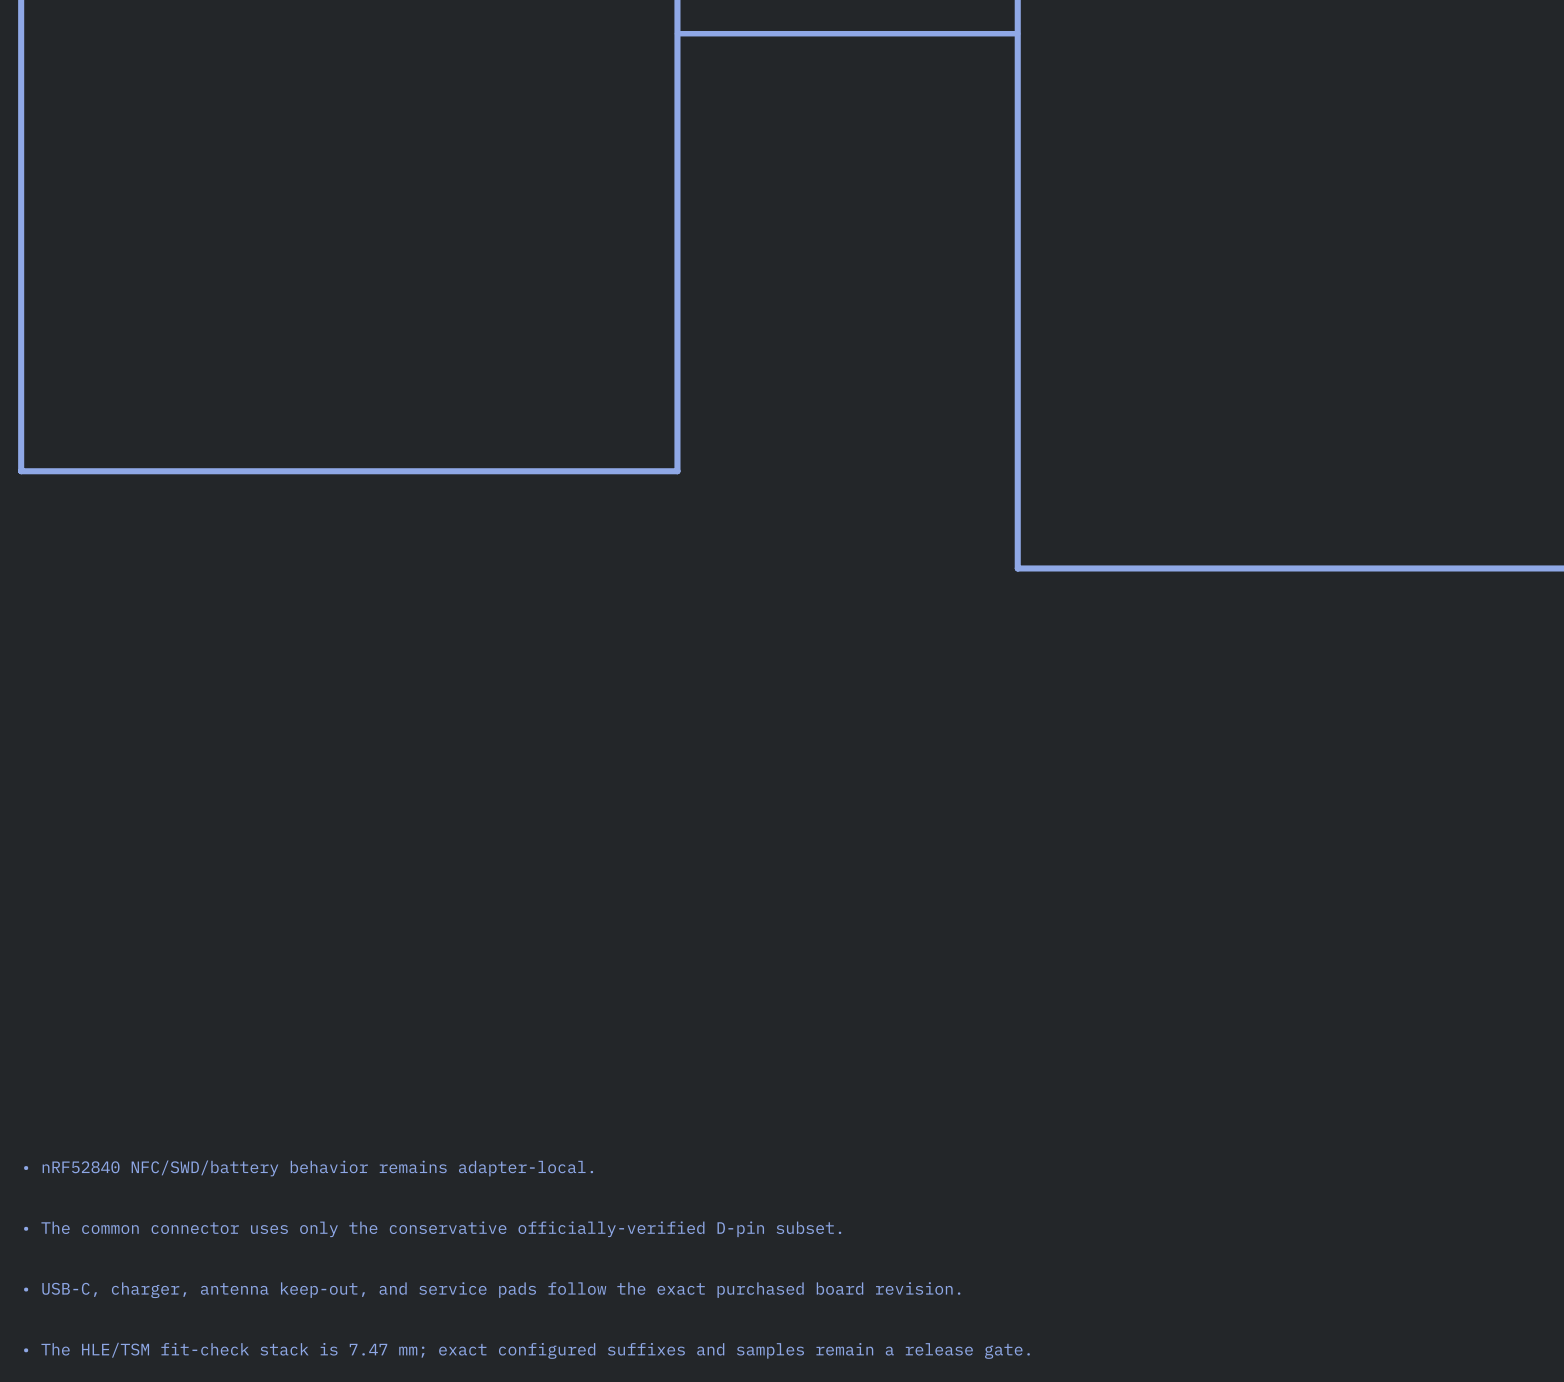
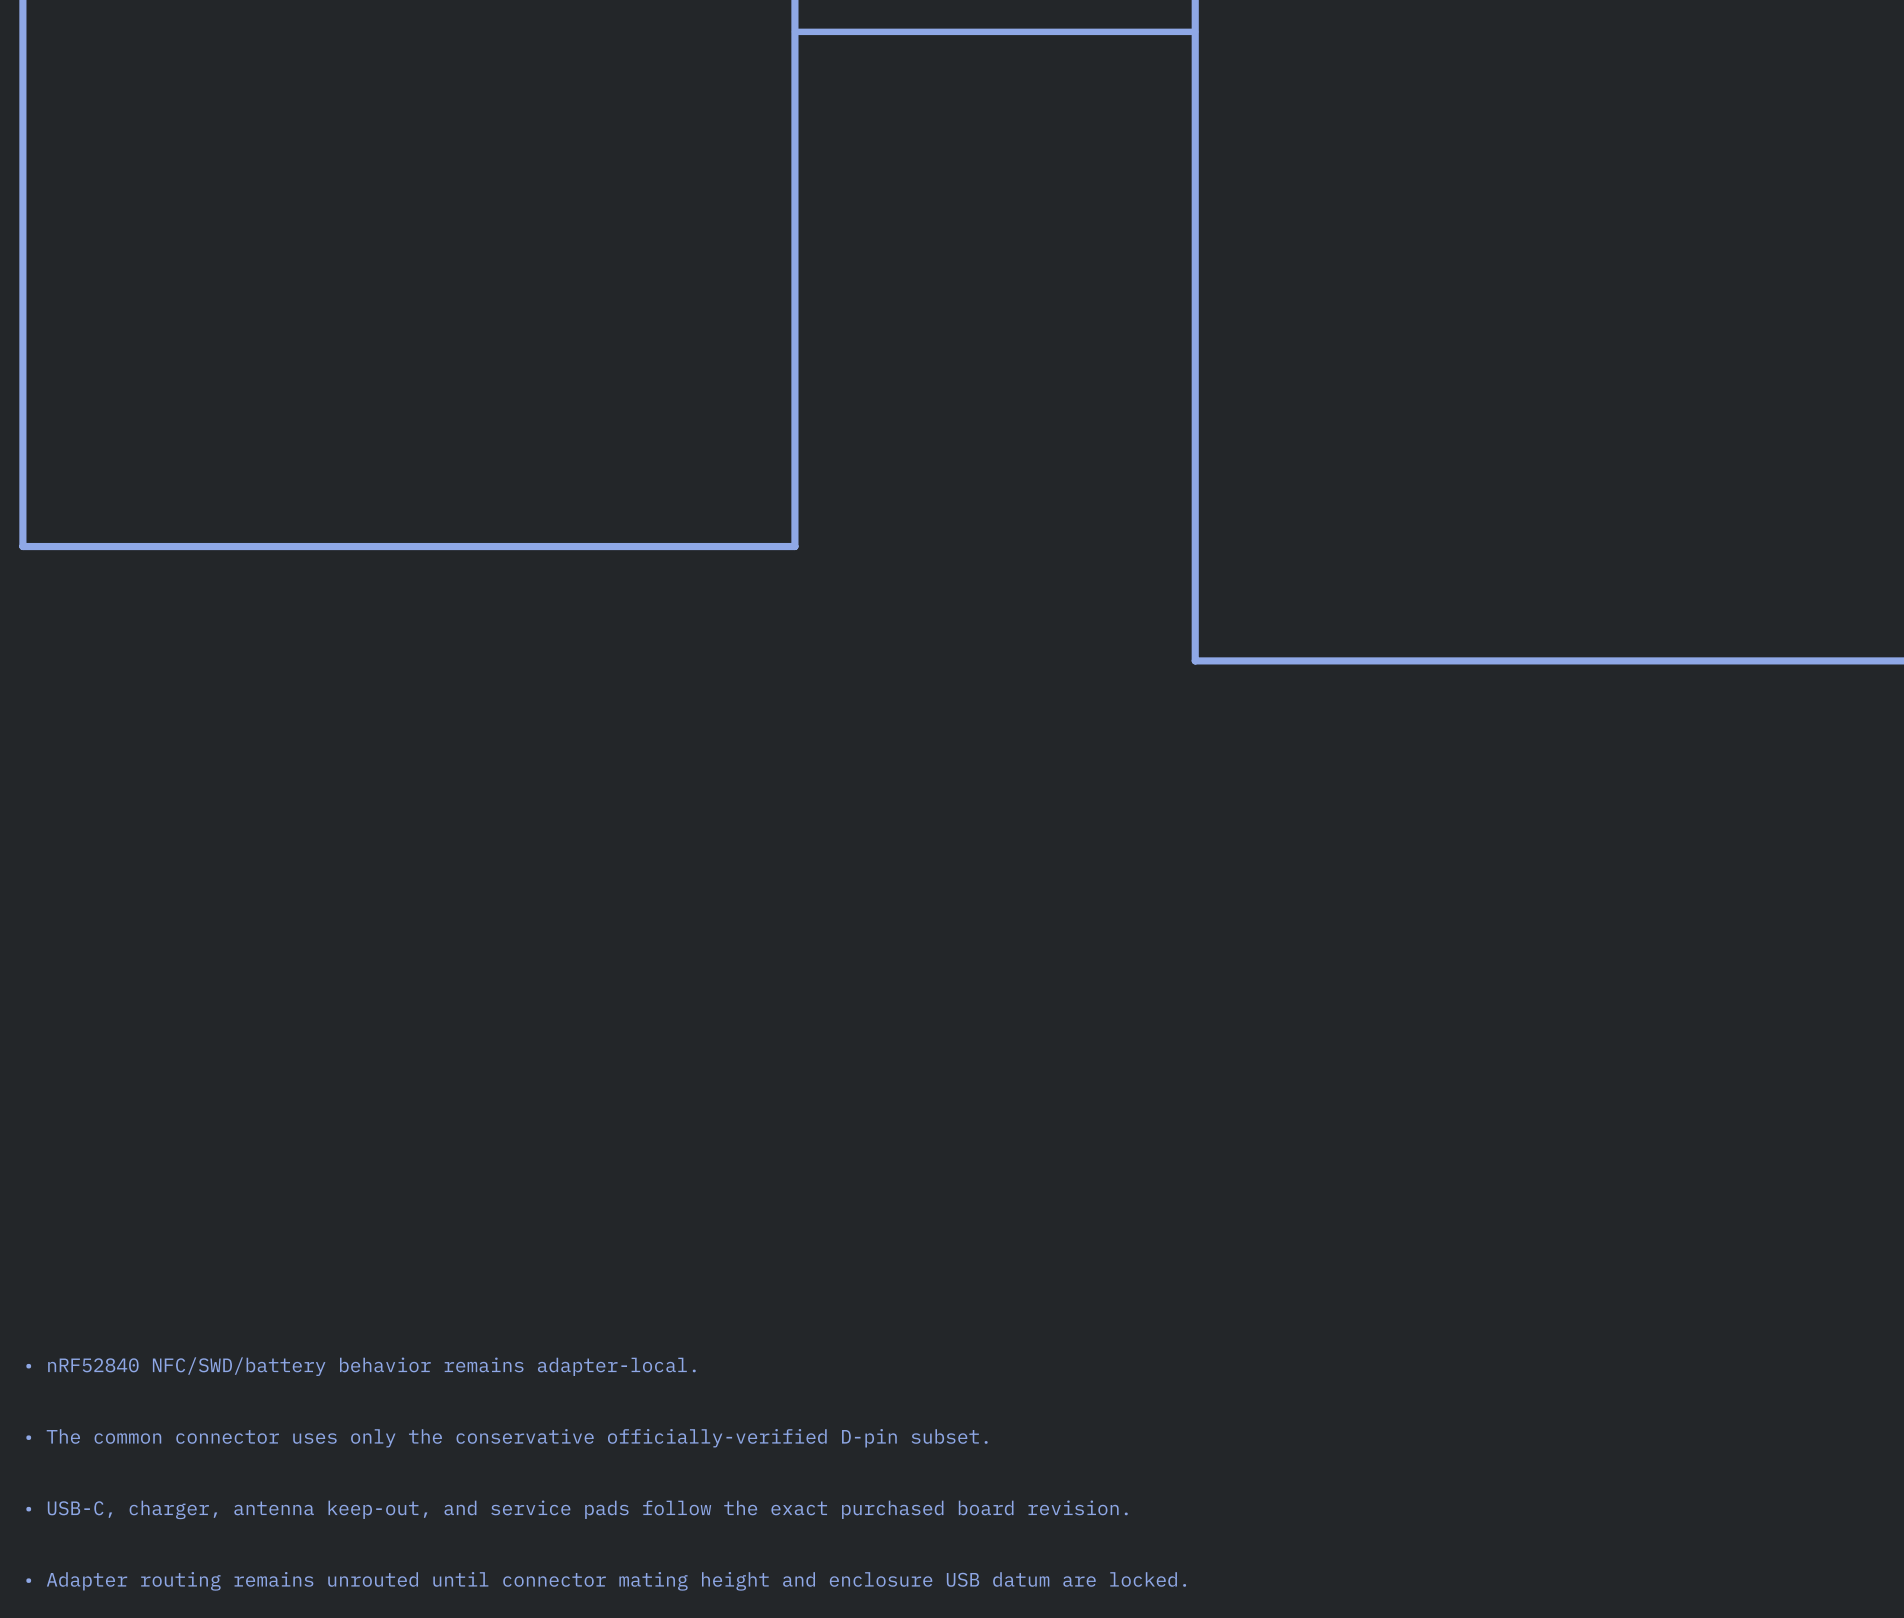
text: • The HLE/TSM fit-check stack is 7.47 mm; exact configured suffixes and samples remain a release gate. (526, 1350) -> • Adapter routing remains unrouted until connector mating height and enclosure USB datum are locked. (606, 1581)

